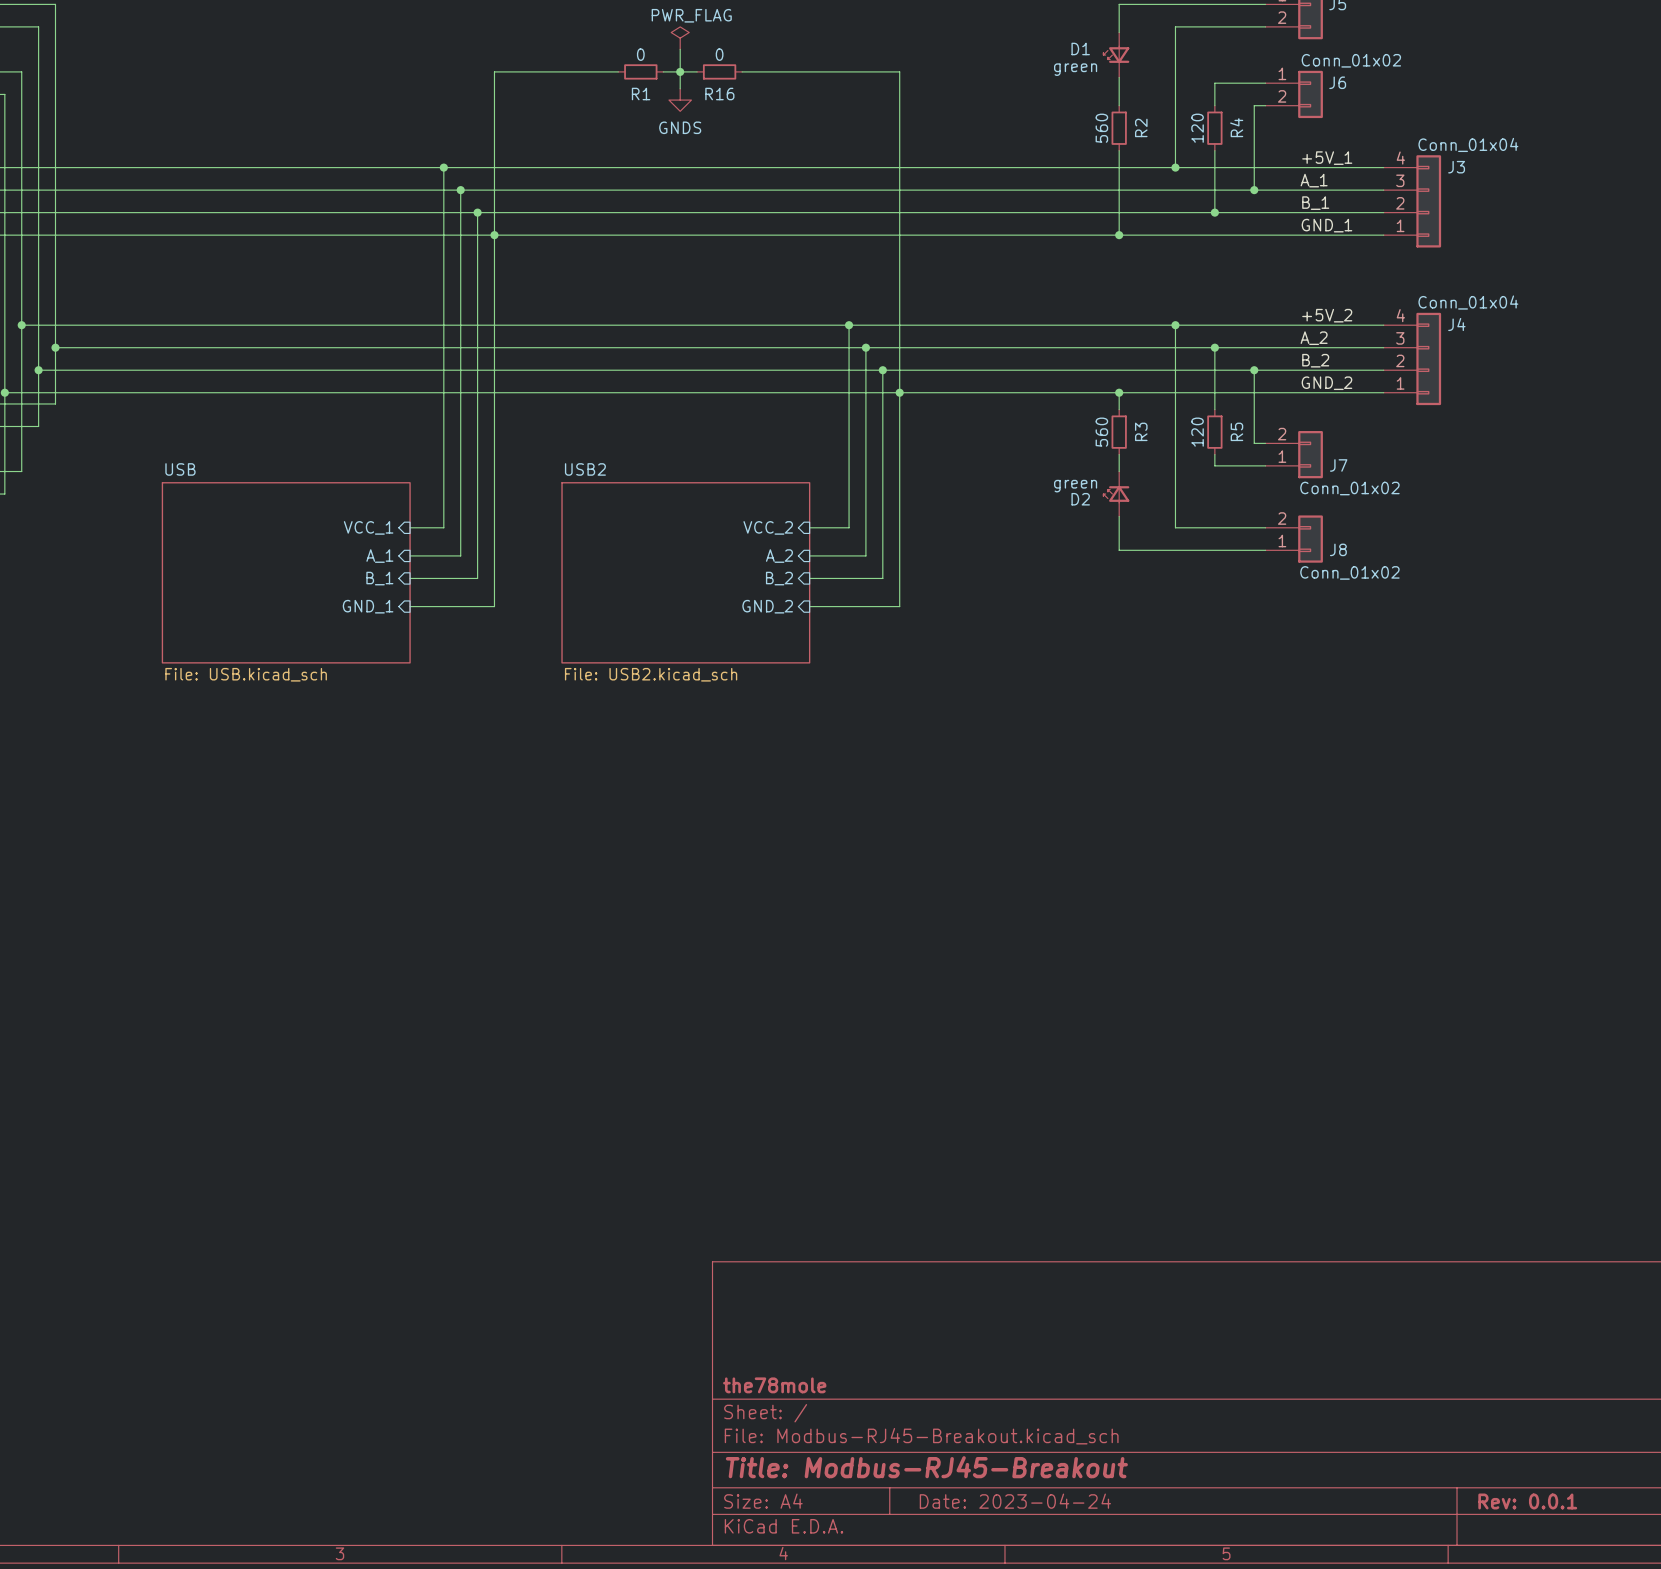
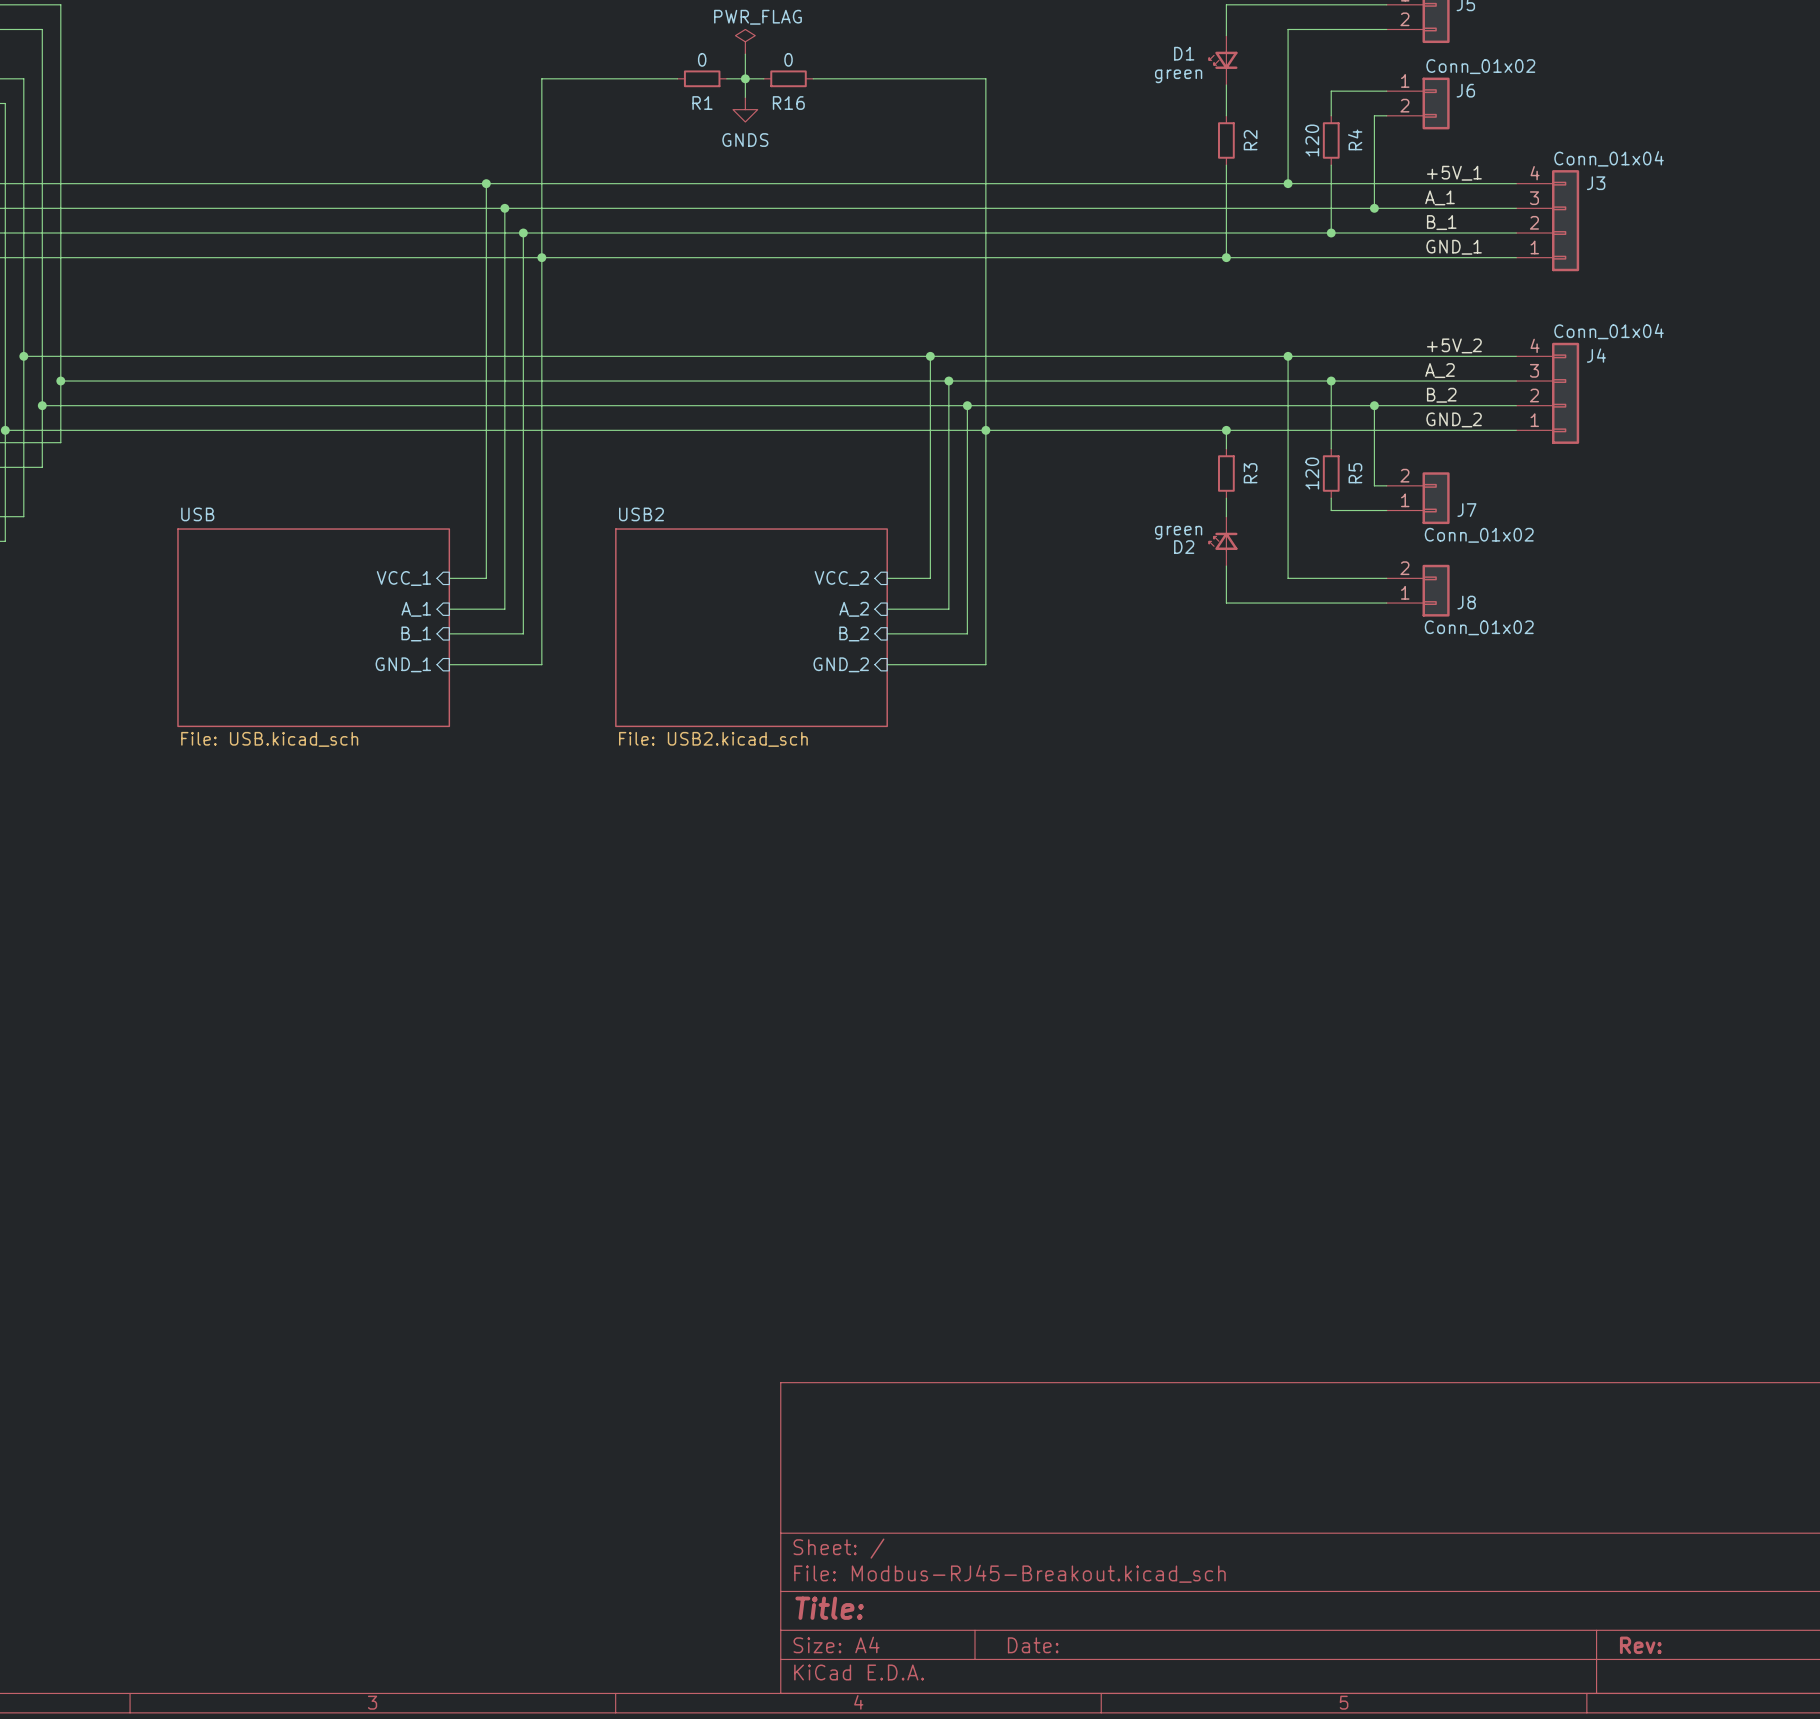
R2 value: 560 (1101, 128) -> none
R3 value: 560 (1101, 432) -> none
title block: the78mole (774, 1385) -> none
title block: Title: Modbus-RJ45-Breakout (926, 1467) -> Title: (829, 1608)
title block: Date: 2023-04-24 (1015, 1501) -> Date: (1033, 1645)
title block: Rev: 0.0.1 (1527, 1501) -> Rev: (1640, 1645)

